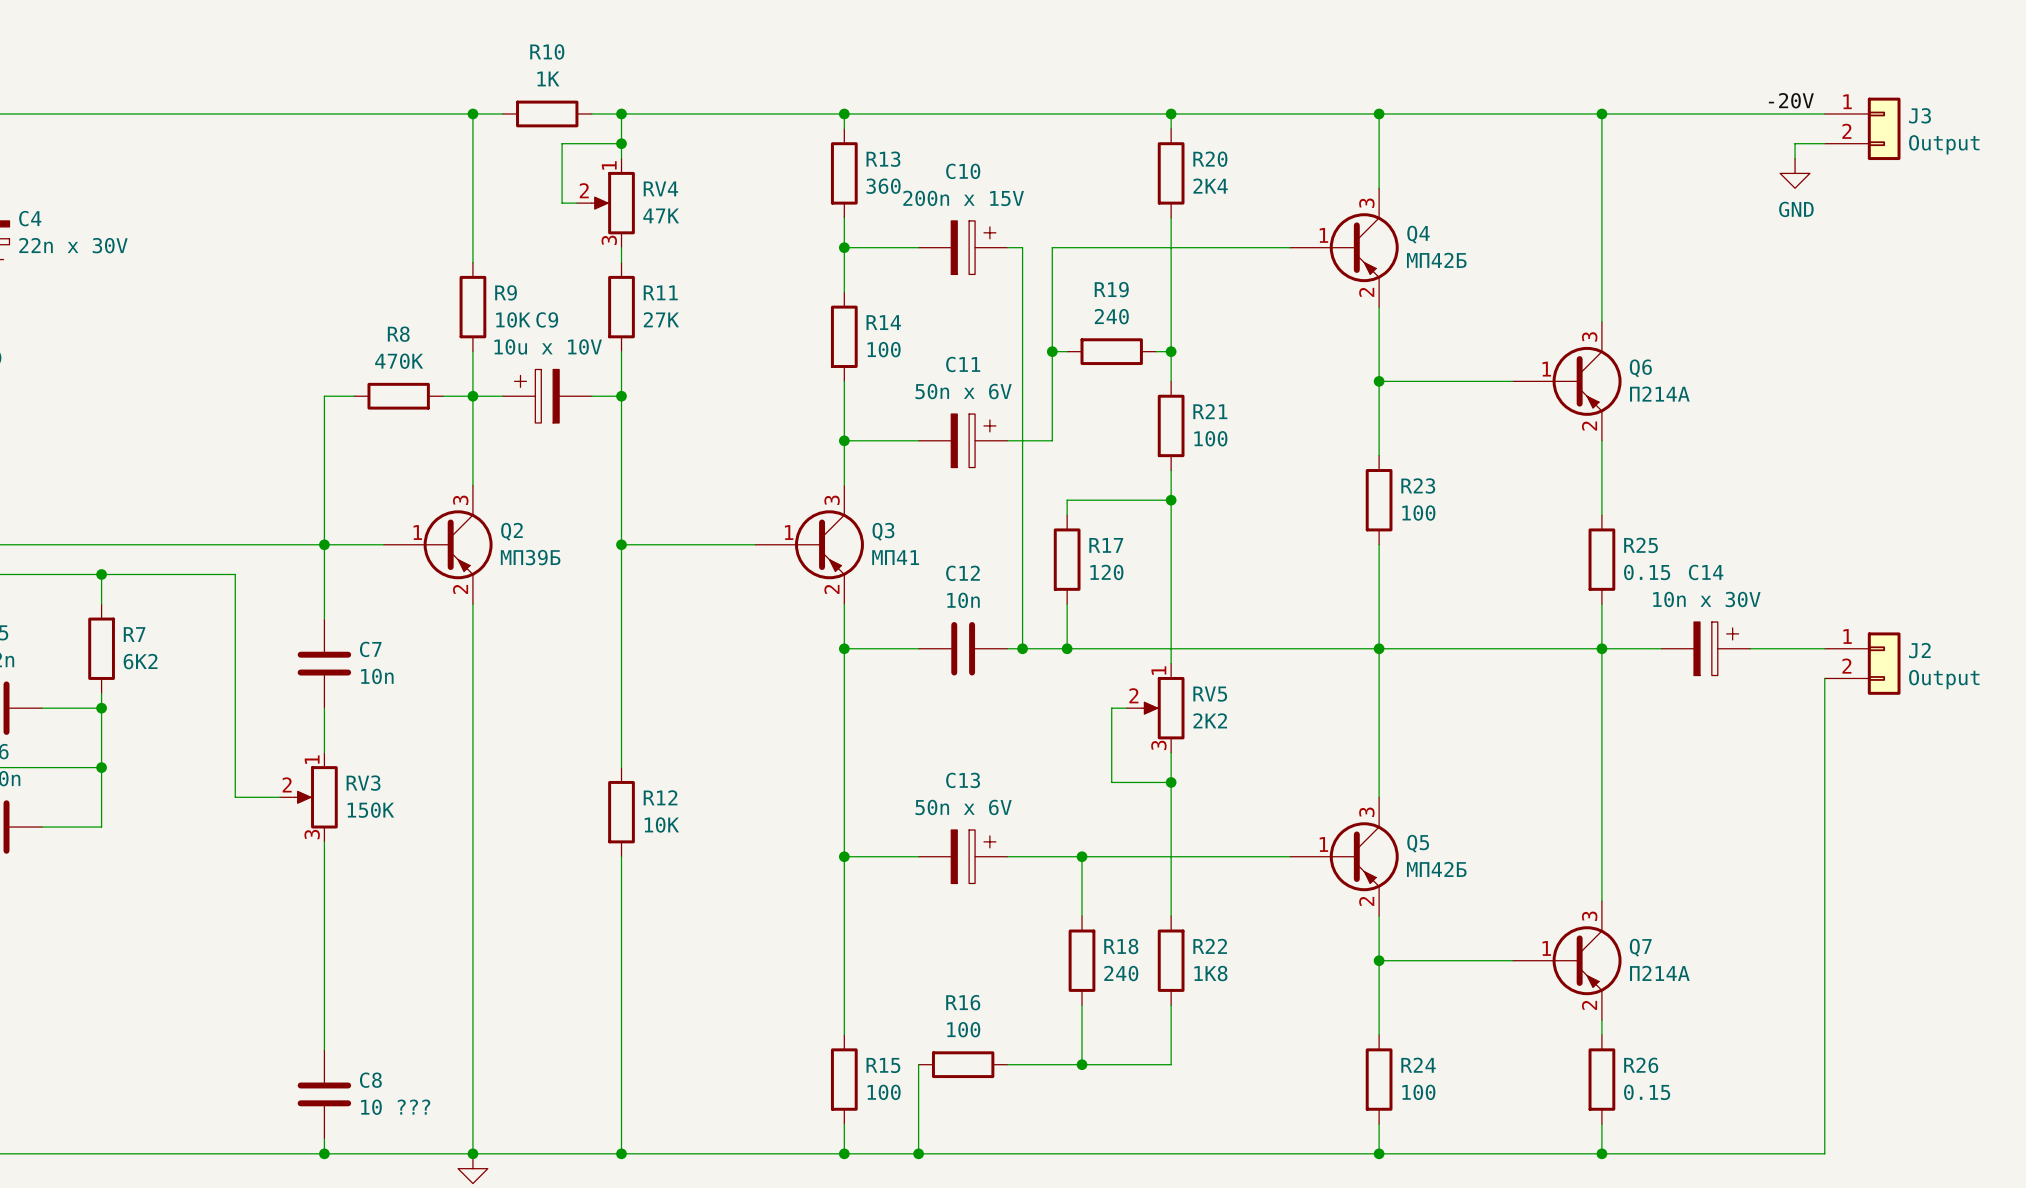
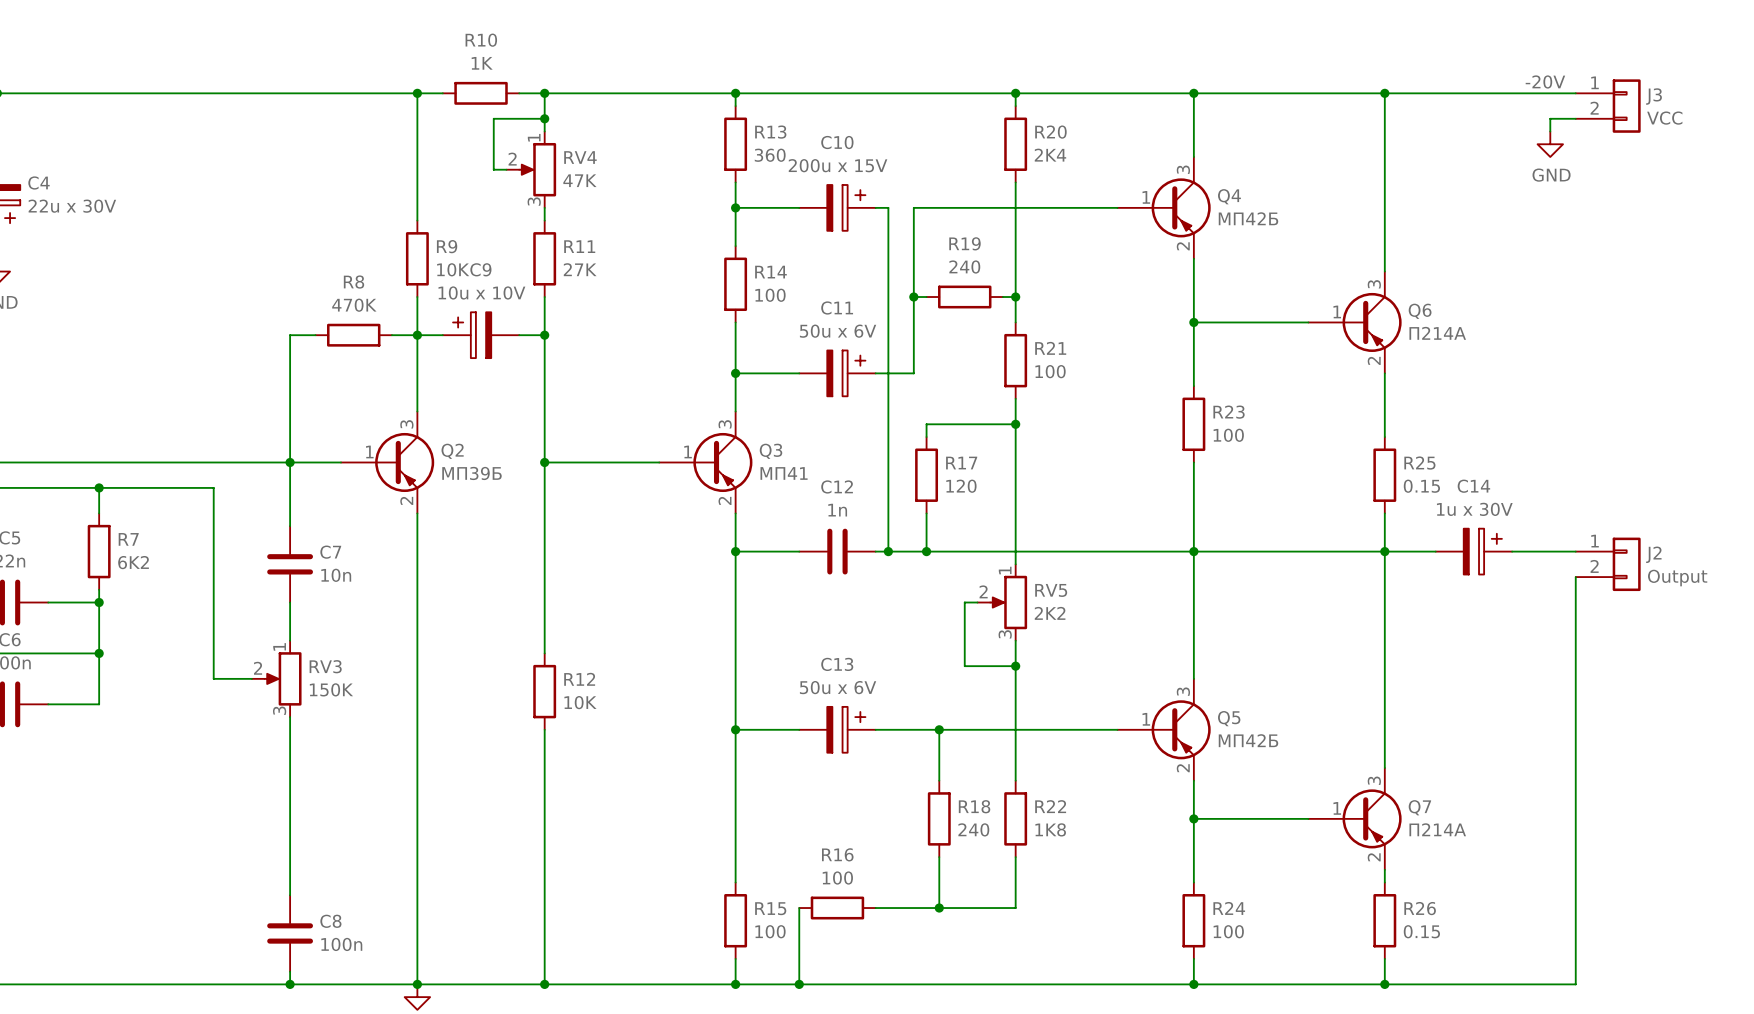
J3 value: Output (1944, 144) -> VCC (1664, 118)
C10 value: 200n x 15V (963, 198) -> 200u x 15V (838, 165)
C4 value: 22n x 30V (73, 245) -> 22u x 30V (72, 206)
C11 value: 50n x 6V (963, 391) -> 50u x 6V (838, 331)
C14 value: 10n x 30V (1706, 599) -> 1u x 30V (1474, 509)
C12 value: 10n (963, 600) -> 1n (837, 510)
C13 value: 50n x 6V (963, 807) -> 50u x 6V (838, 687)
C8 value: 10 ??? (395, 1107) -> 100n (341, 944)

